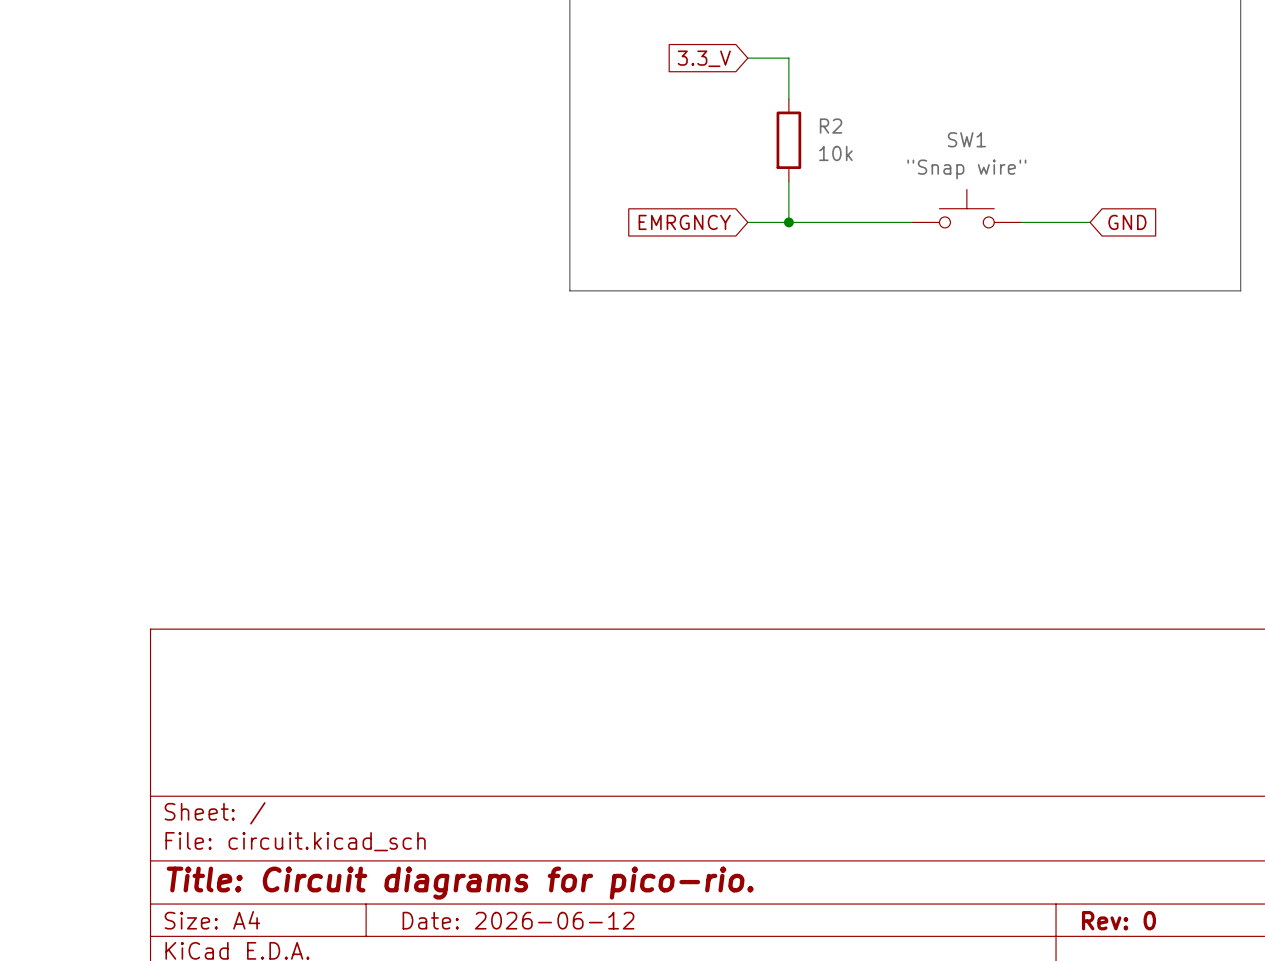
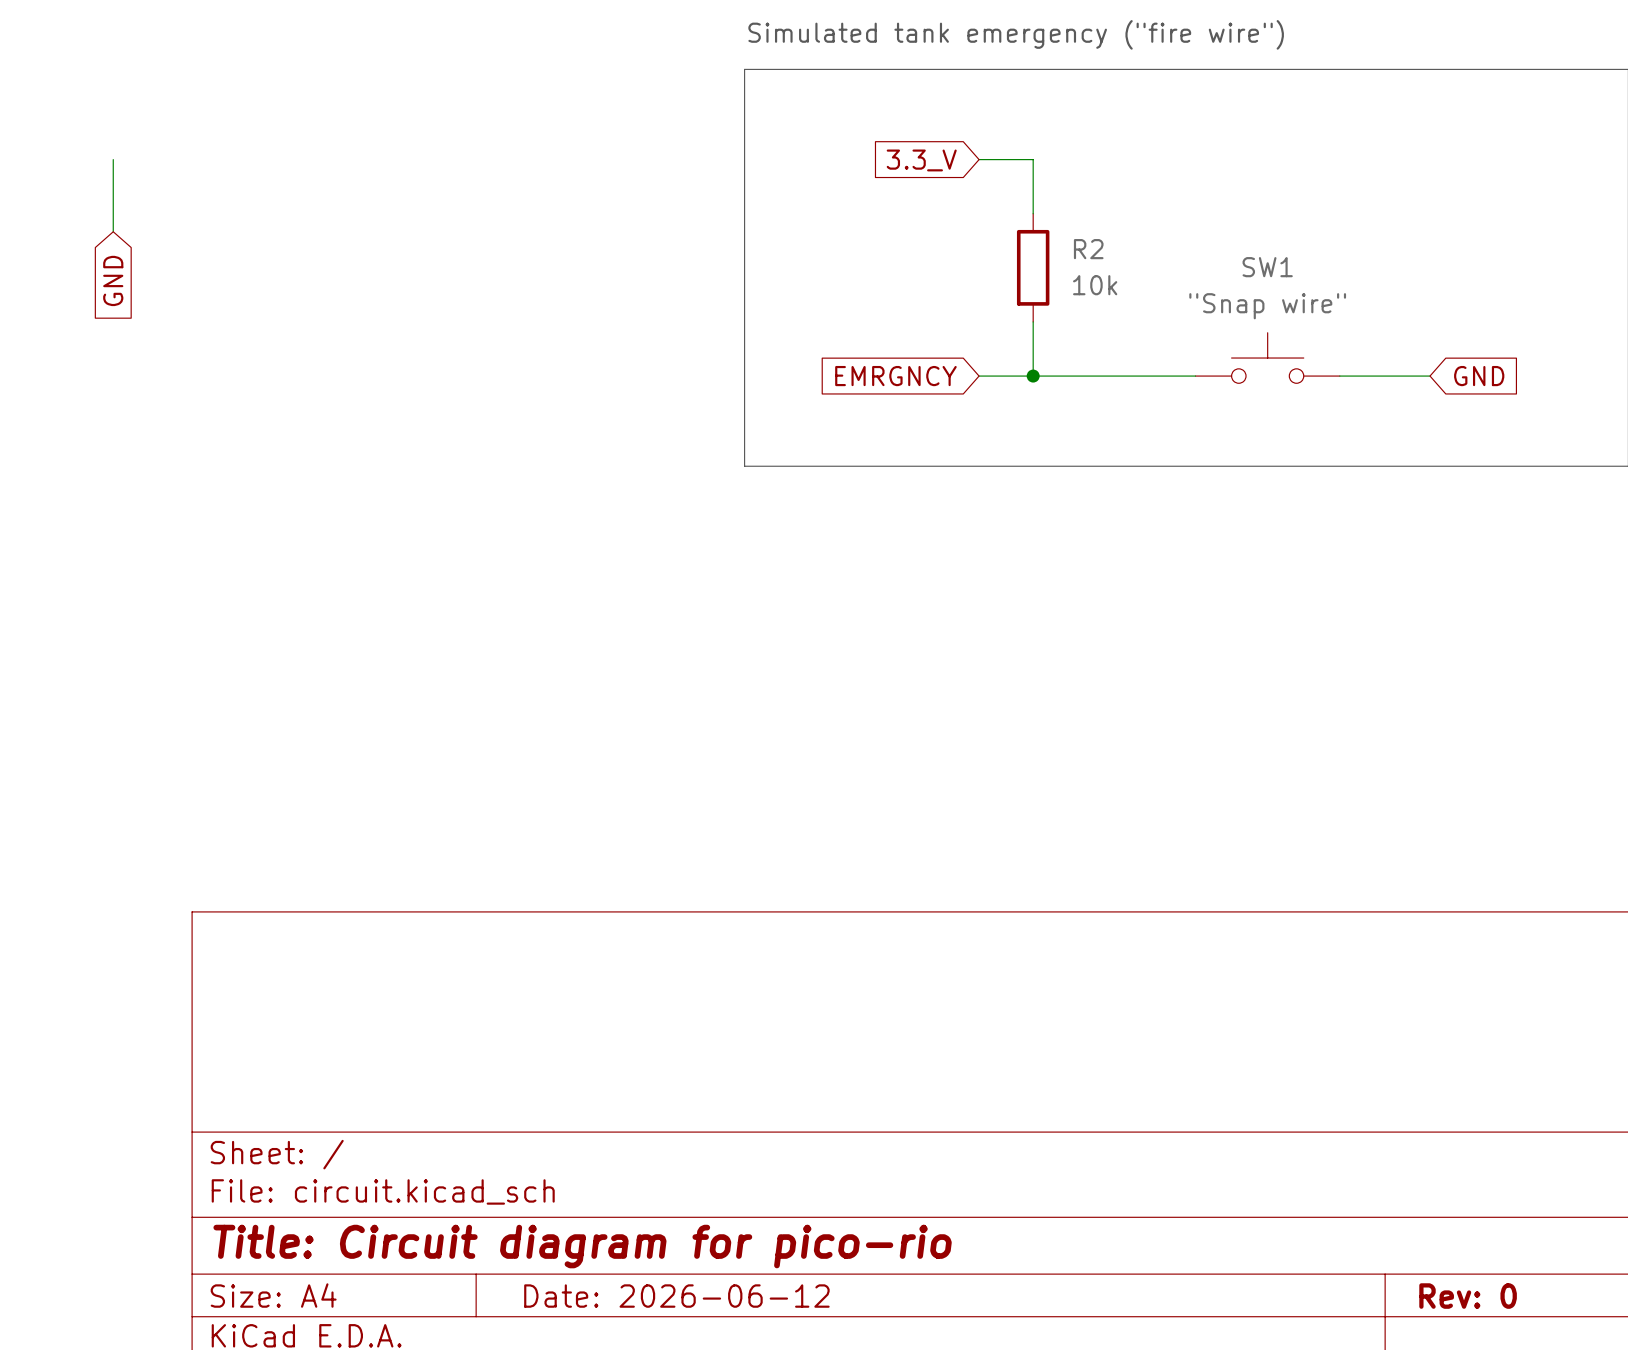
wire: none -> (113, 159) (113, 231)
global label: none -> GND (113, 280)
title block: Title: Circuit diagrams for pico-rio. (460, 883) -> Title: Circuit diagram for pico-rio (582, 1246)

